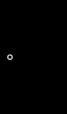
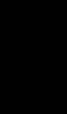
via: (9, 57) -> none

